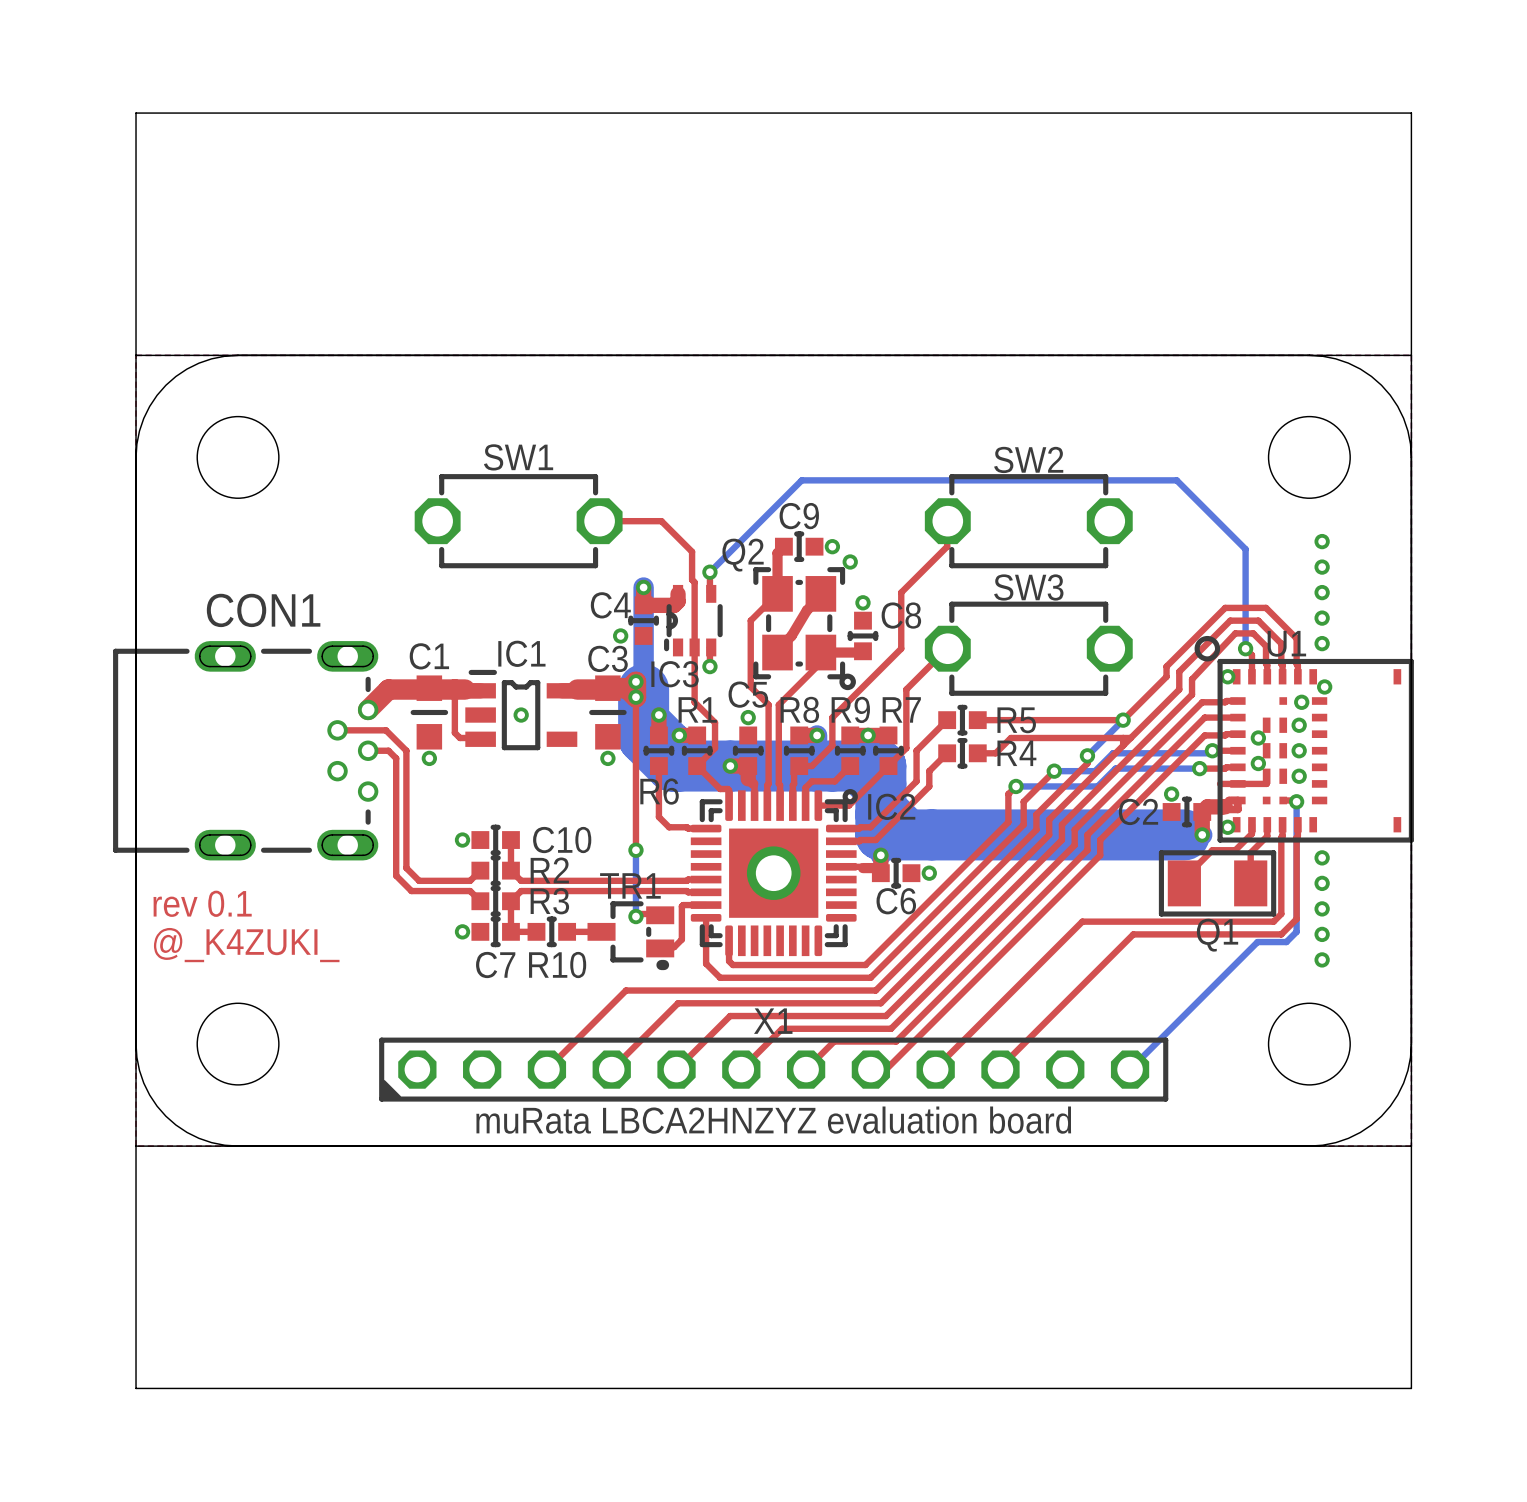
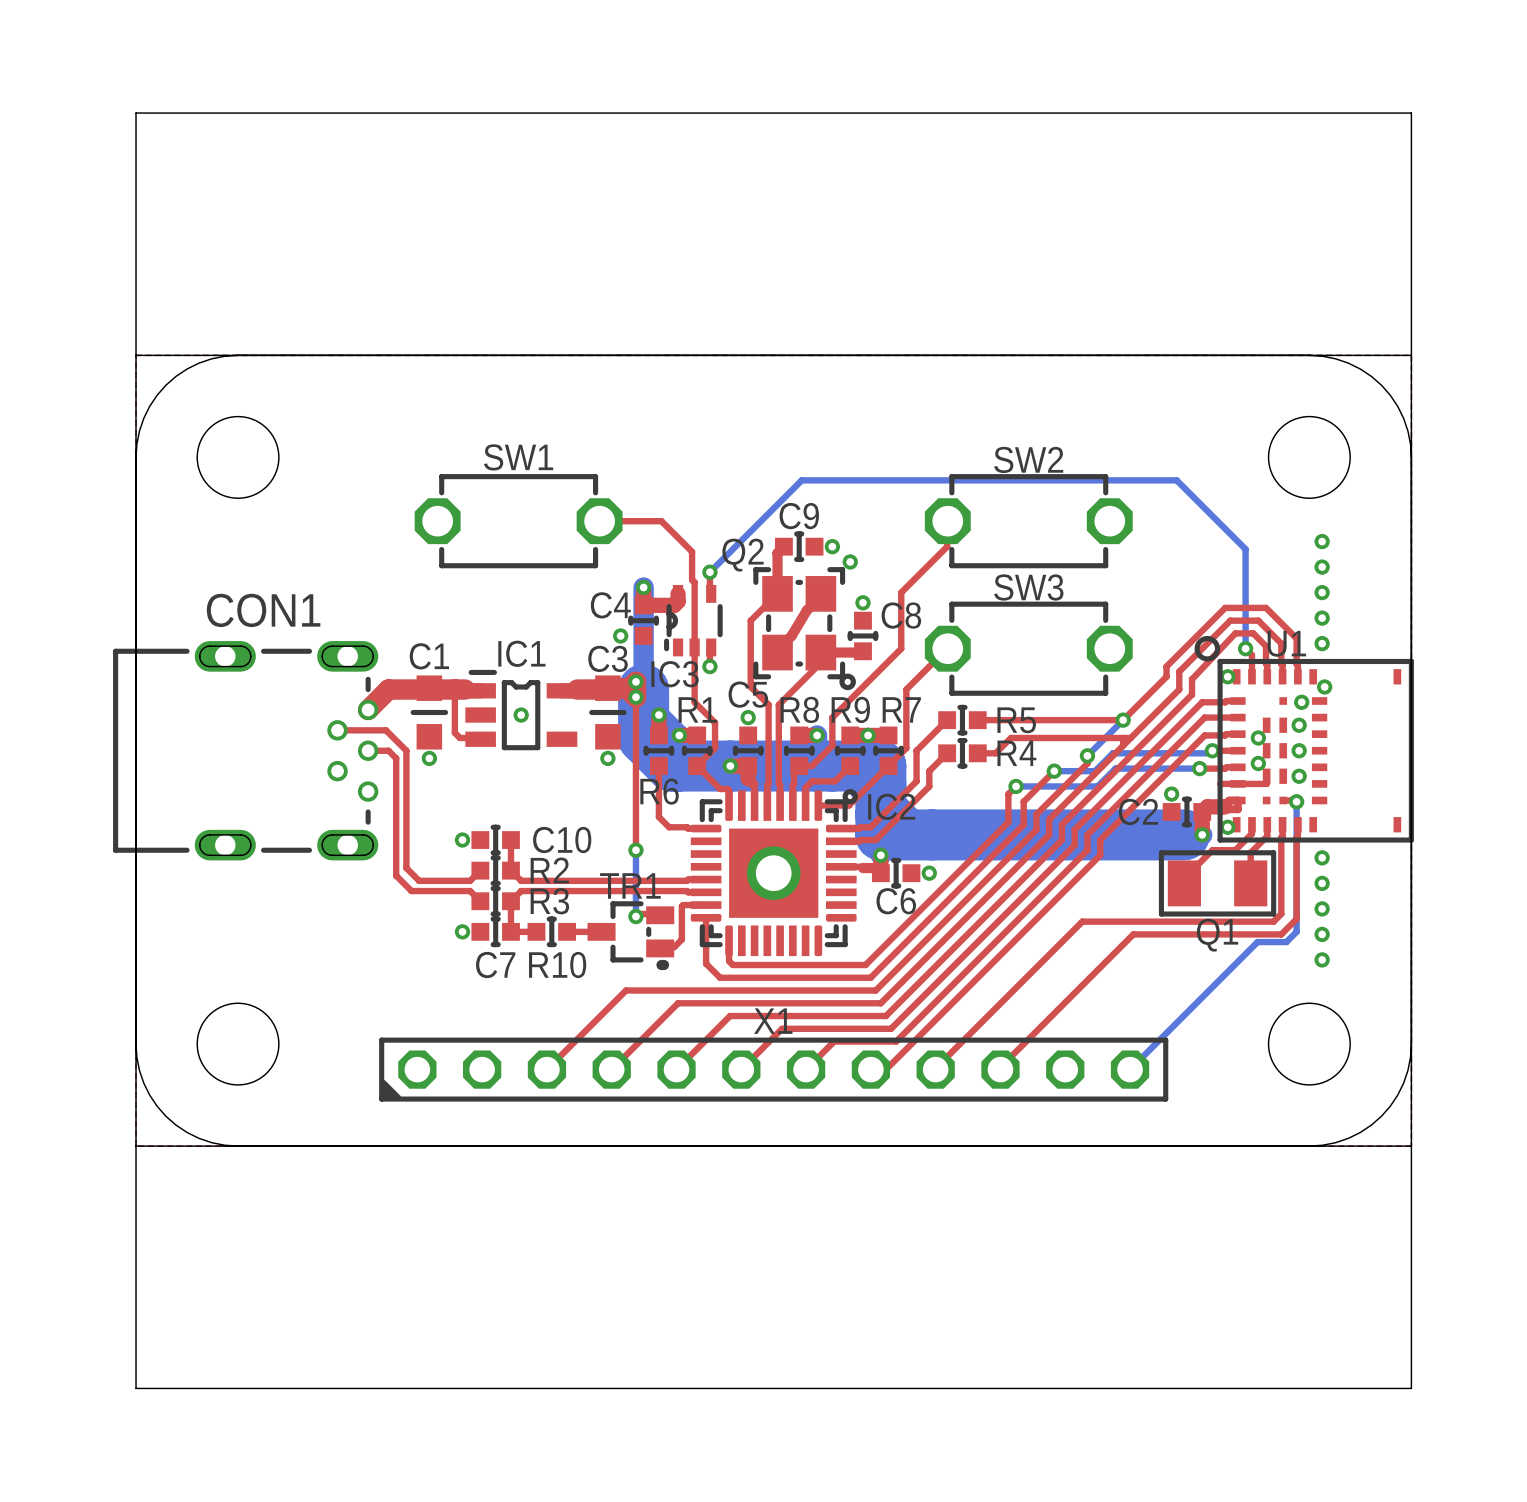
text: rev 0.1 (202, 903) -> none
text: @_K4ZUKI_ (246, 945) -> none
text: muRata LBCA2HNZYZ evaluation board (773, 1120) -> none

